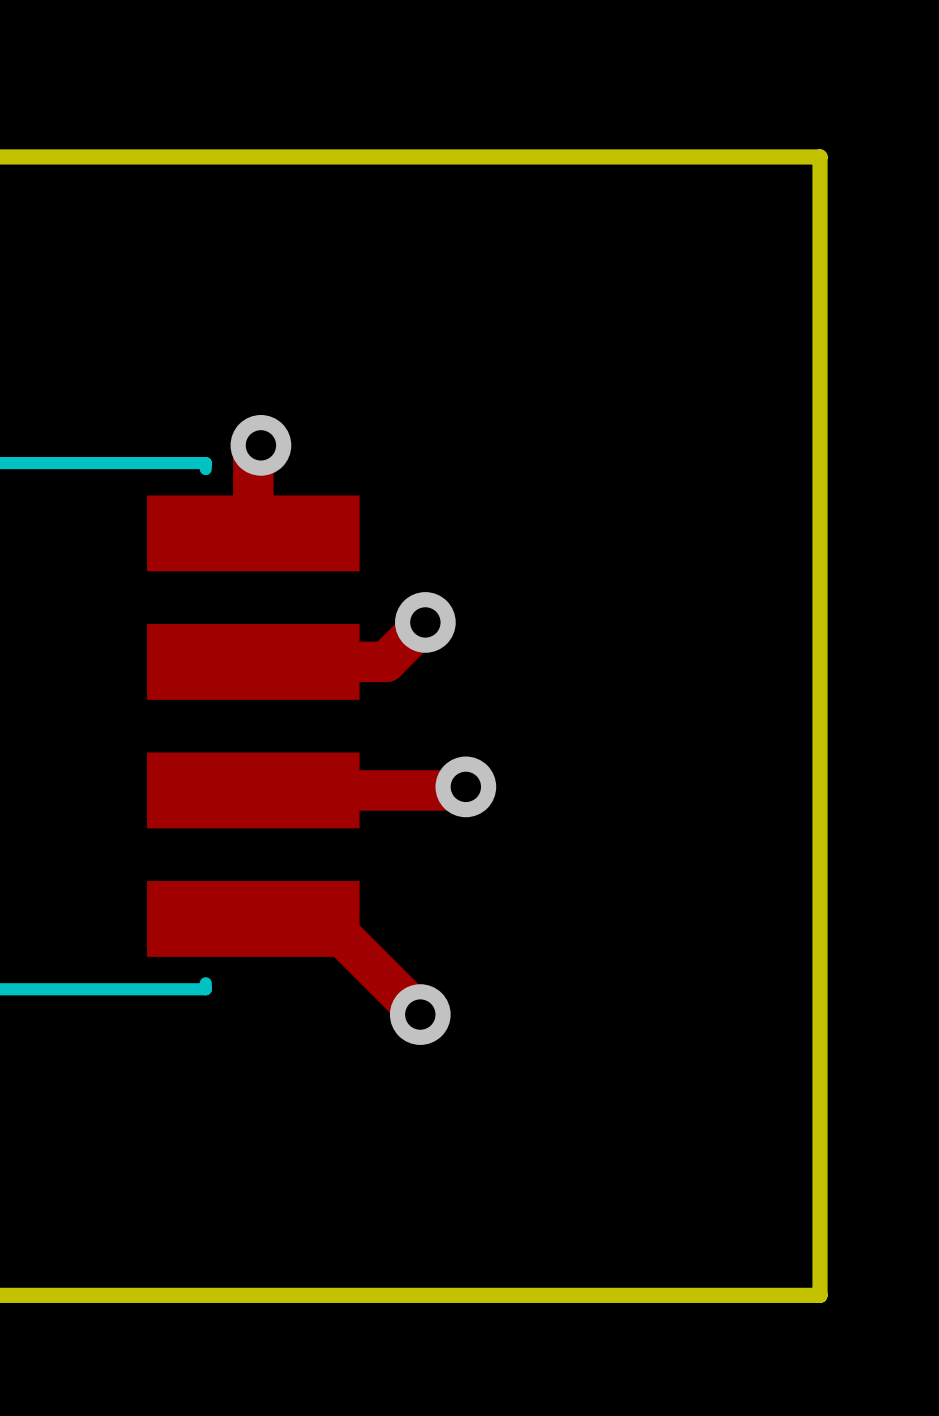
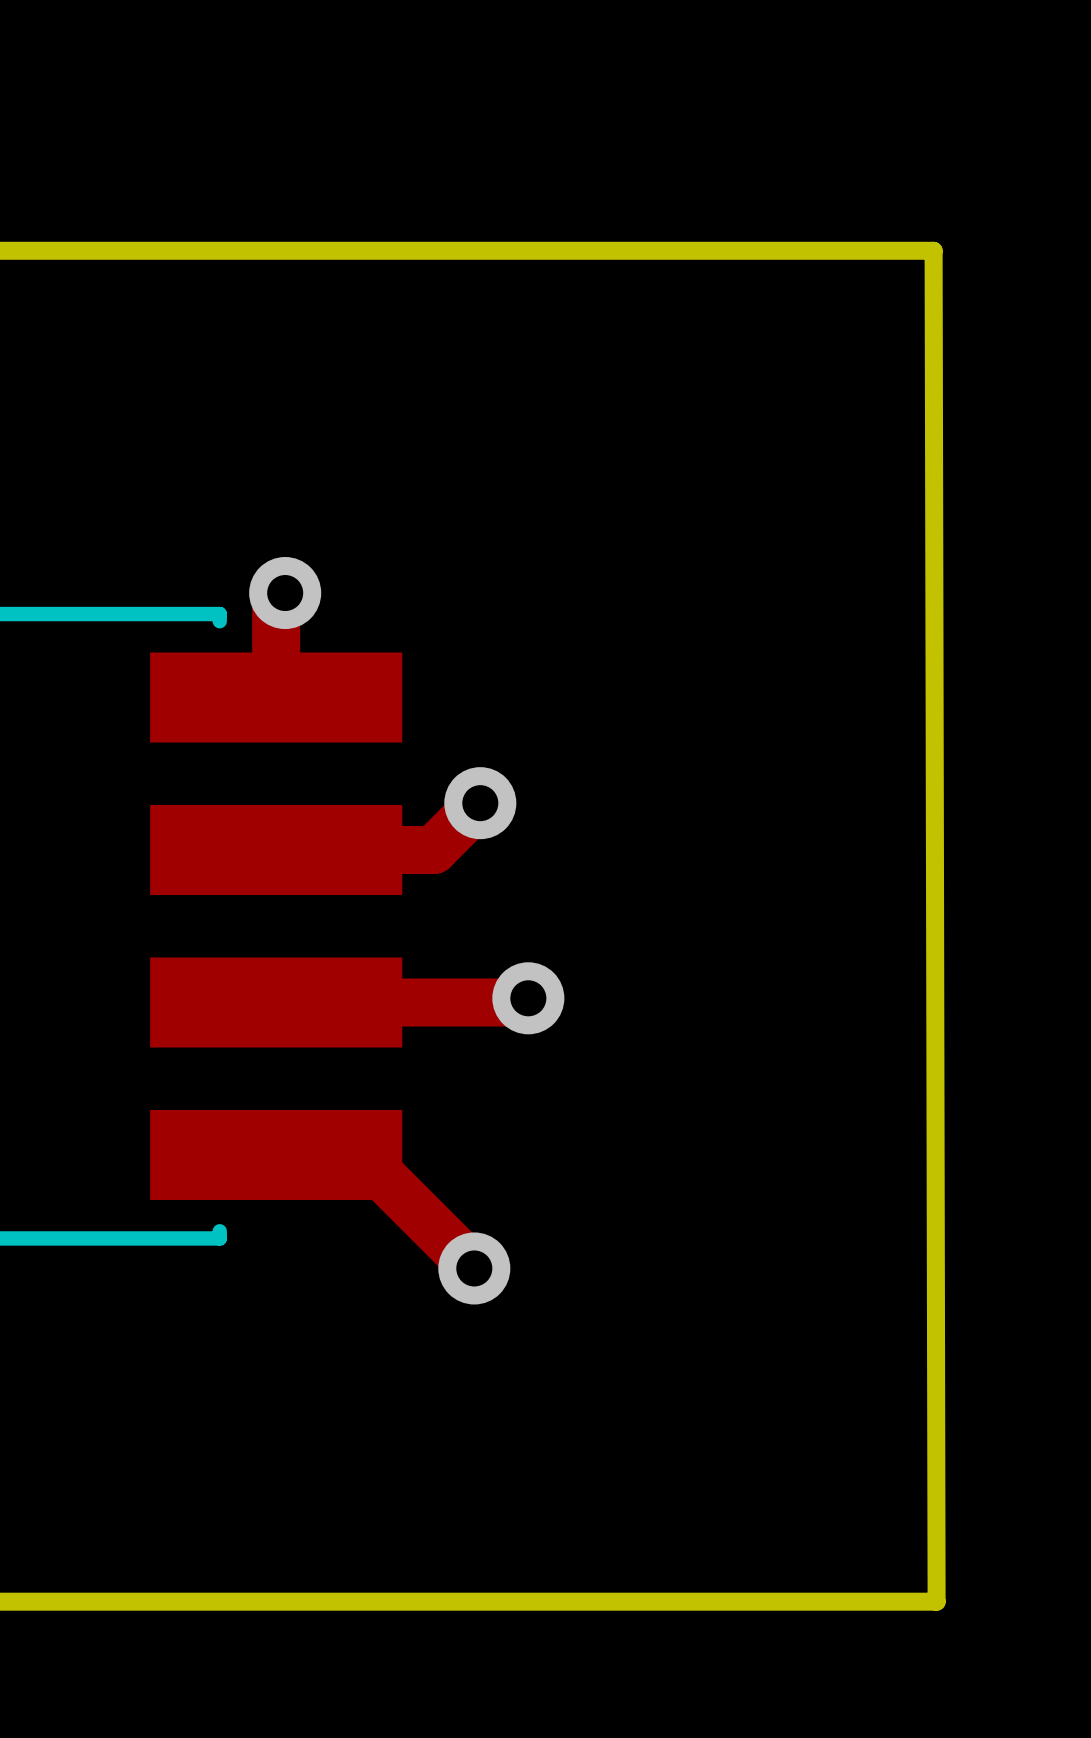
board edge: (807, 156) (820, 156) (820, 1295) (809, 1295) -> (933, 250) (936, 1601)

